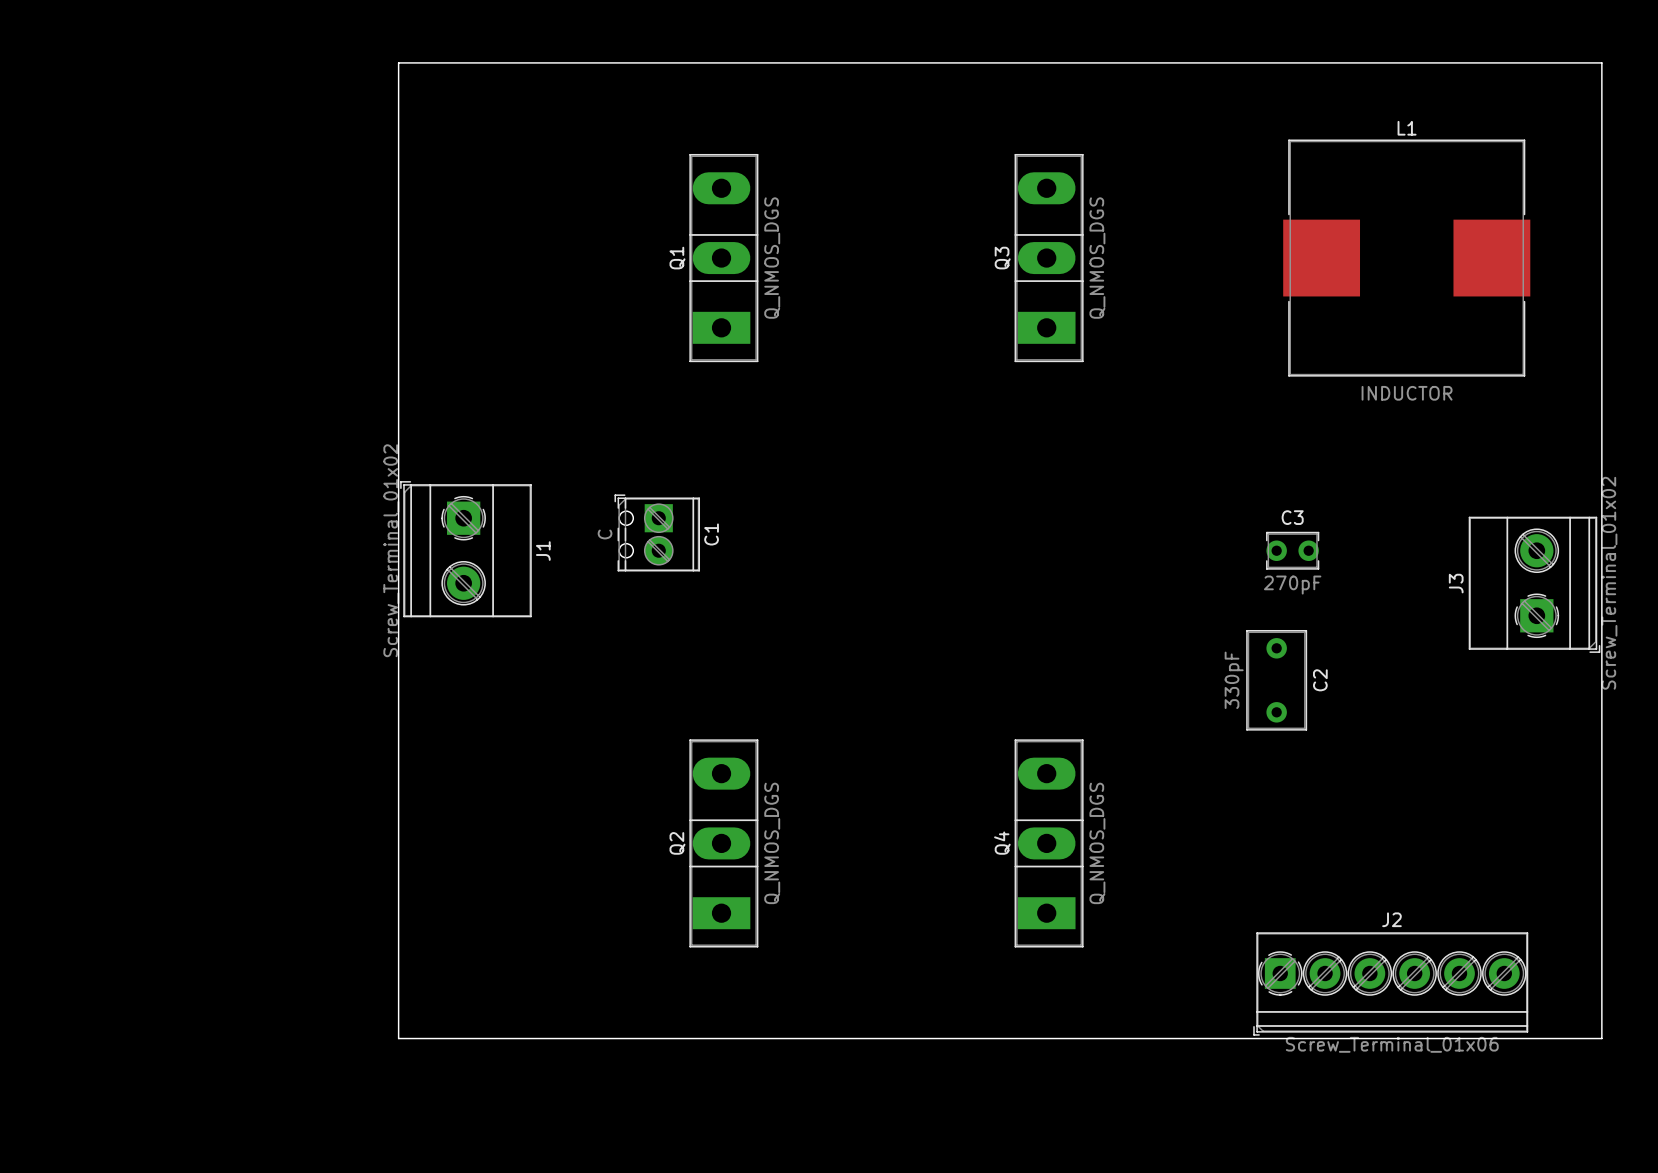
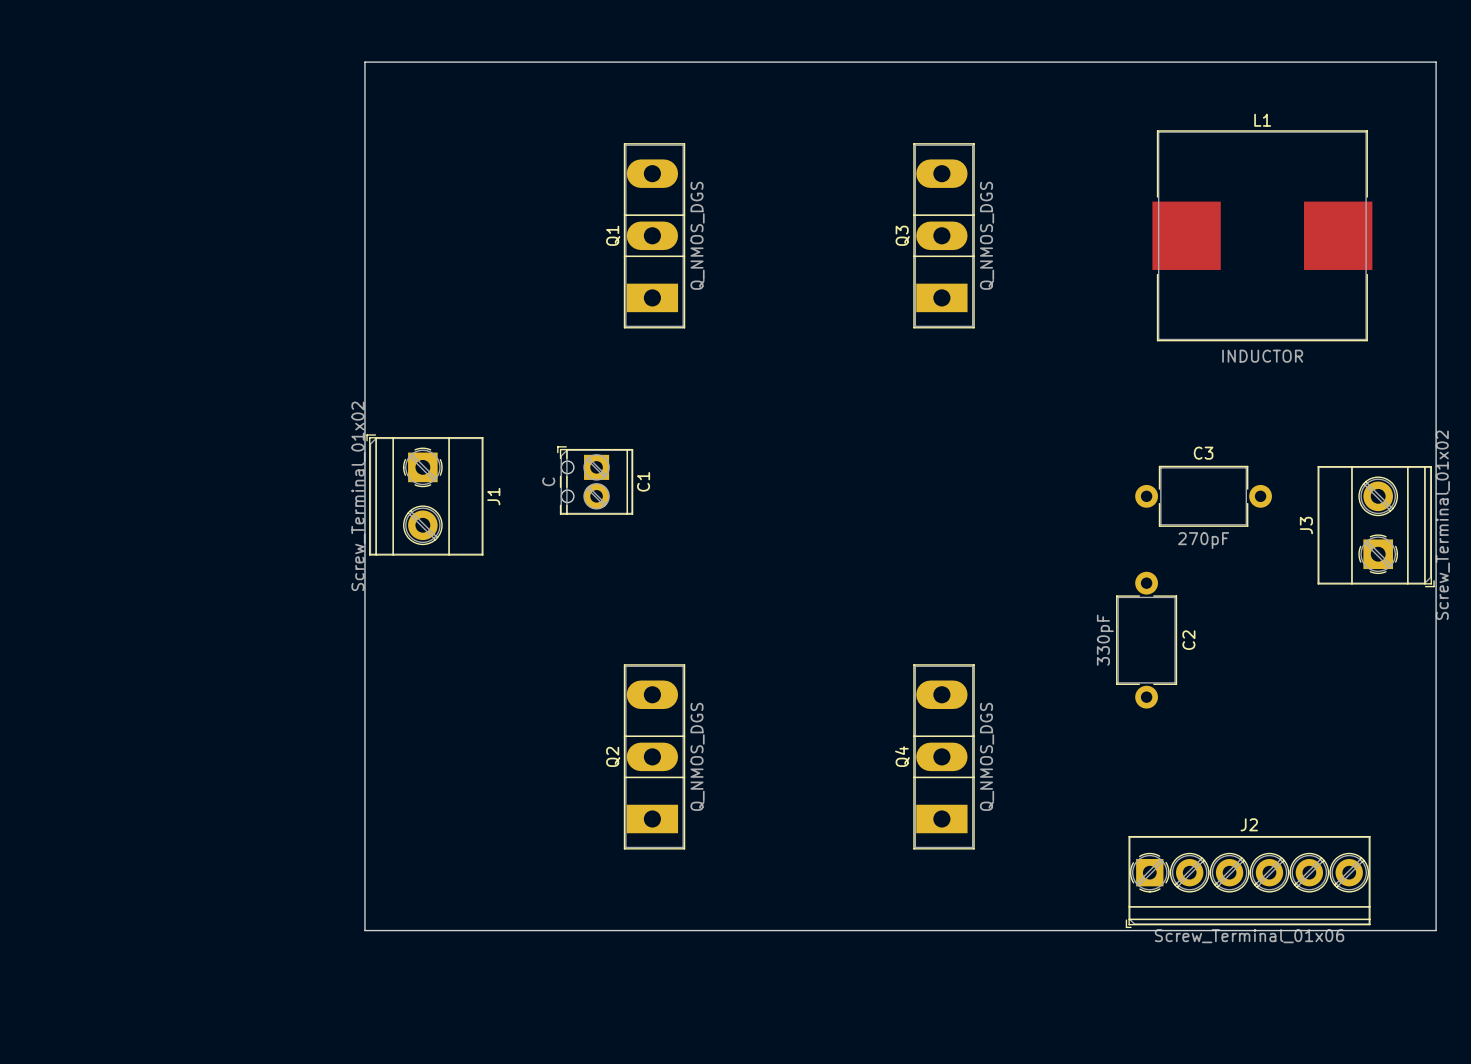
C3 footprint: [1266, 531, 1320, 570] -> [1135, 465, 1272, 527]
C2 footprint: [1246, 629, 1308, 731] -> [1116, 571, 1178, 709]

